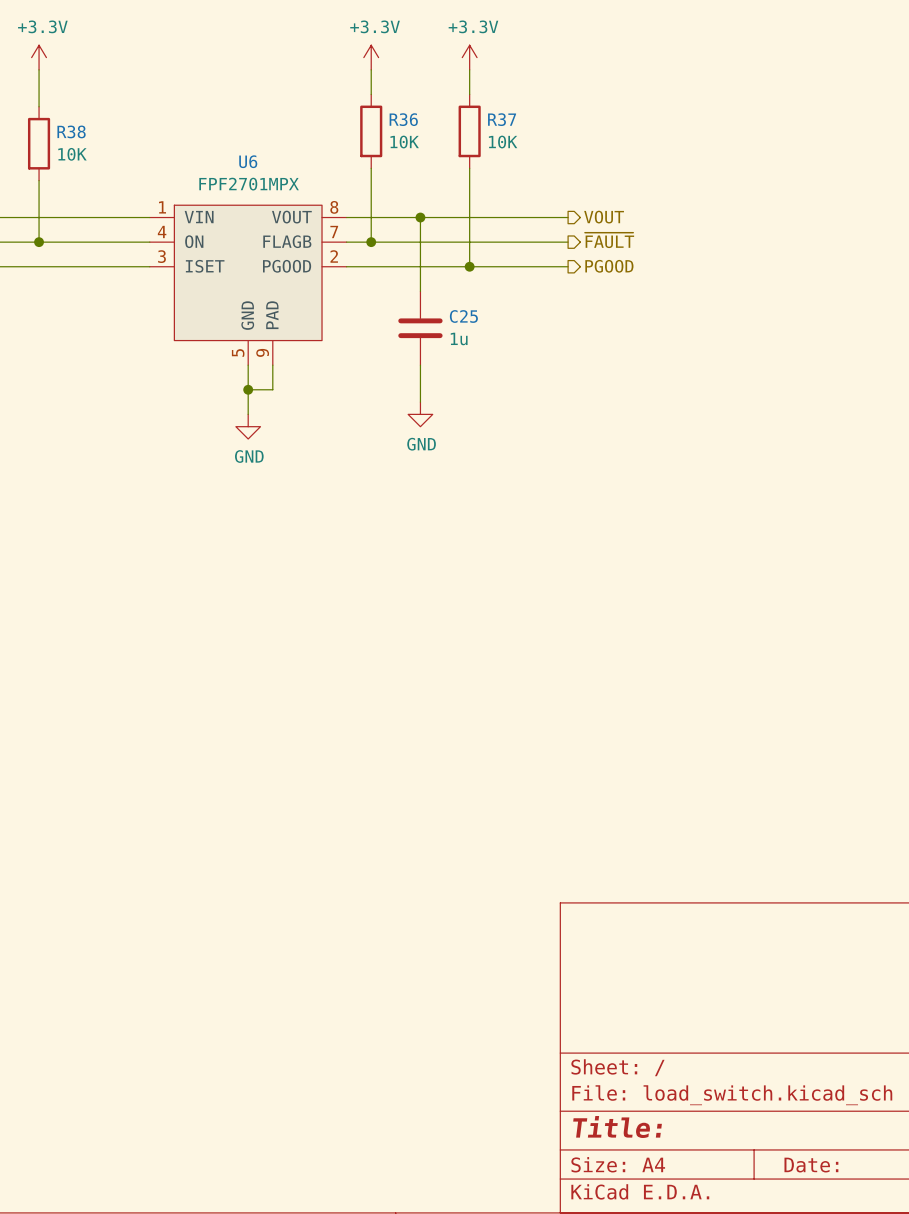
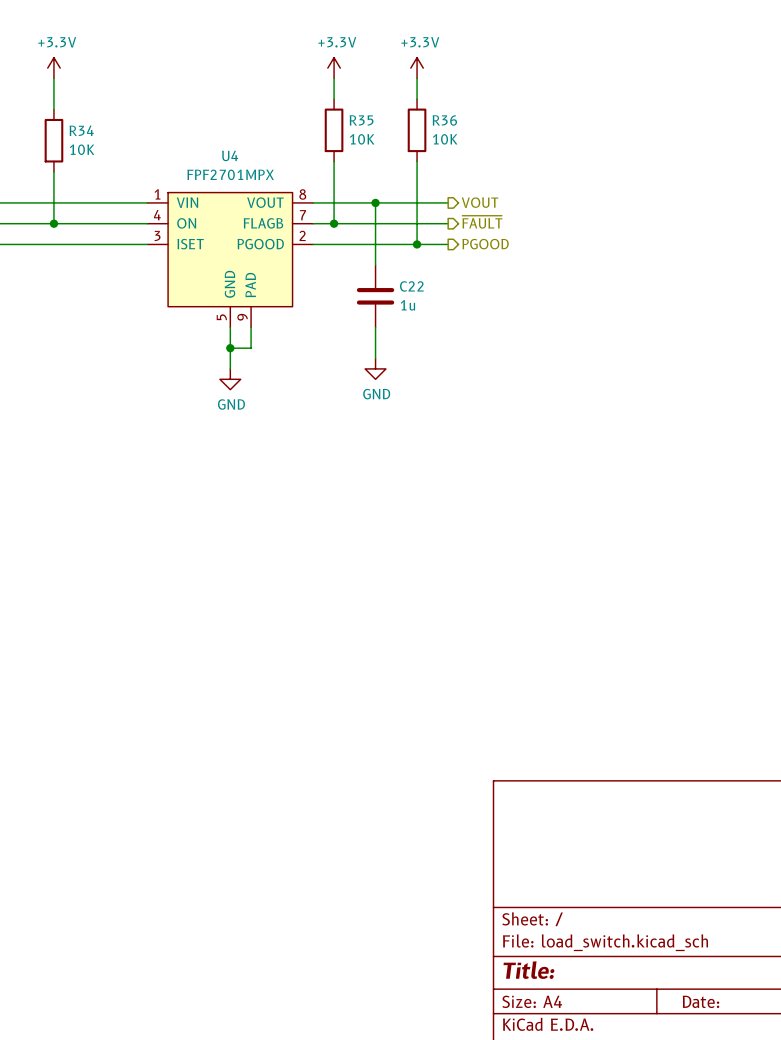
R36 name: R36 (403, 119) -> R35 (361, 120)
R37 name: R37 (502, 119) -> R36 (444, 120)
R38 name: R38 (71, 131) -> R34 (81, 130)
U6 name: U6 (248, 161) -> U4 (230, 155)
wire: (506, 217) (568, 217) -> none
hierarchical label position: VOUT (604, 217) -> VOUT (480, 202)
hierarchical label position: ~{FAULT} (609, 240) -> ~{FAULT} (482, 222)
wire: (506, 242) (568, 242) -> none
wire: (506, 266) (568, 266) -> none
hierarchical label position: PGOOD (609, 266) -> PGOOD (485, 244)
C25 name: C25 (463, 316) -> C22 (411, 286)

